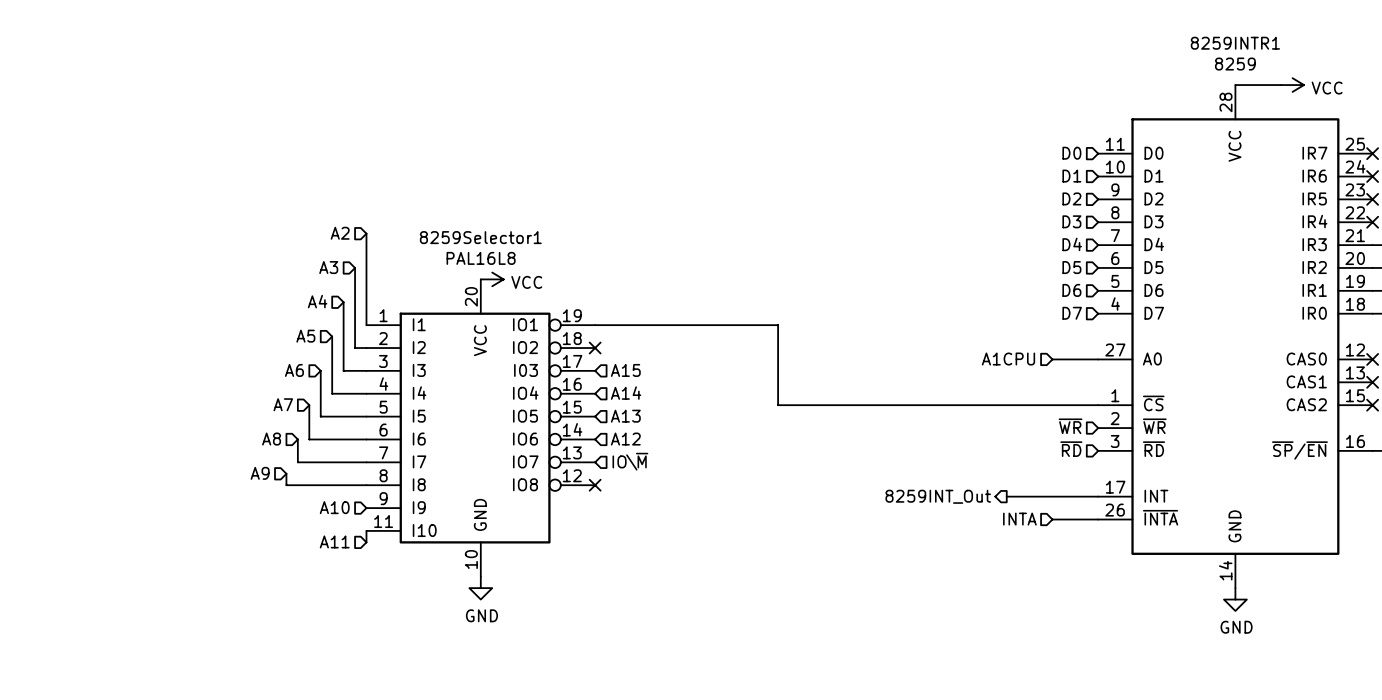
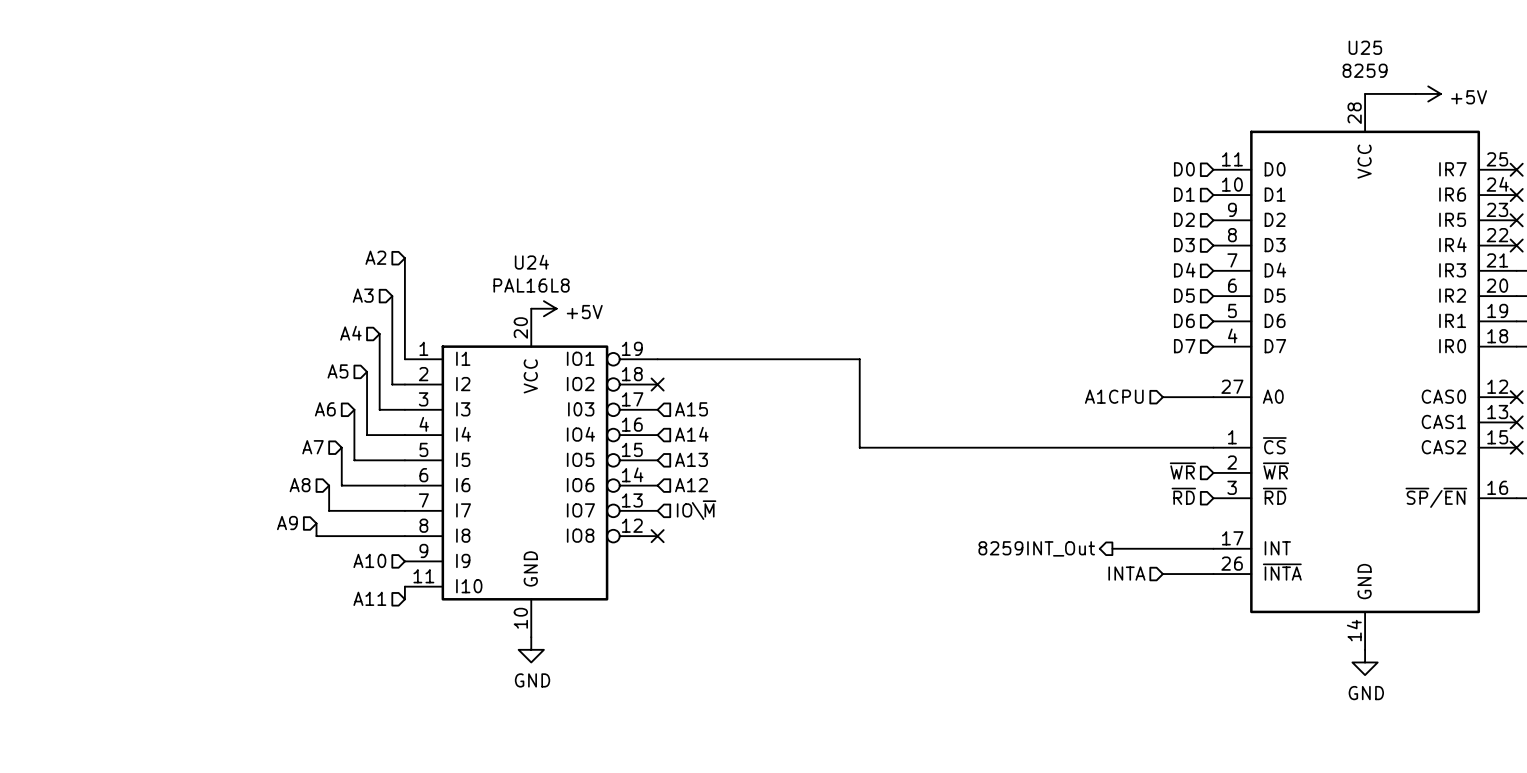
8259INTR1 name: 8259INTR1 (1235, 43) -> U25 (1365, 47)
power symbol: VCC (1292, 85) -> +5V (1428, 93)
8259Selector1 name: 8259Selector1 (480, 237) -> U24 (531, 262)
power symbol: VCC (492, 279) -> +5V (543, 308)

